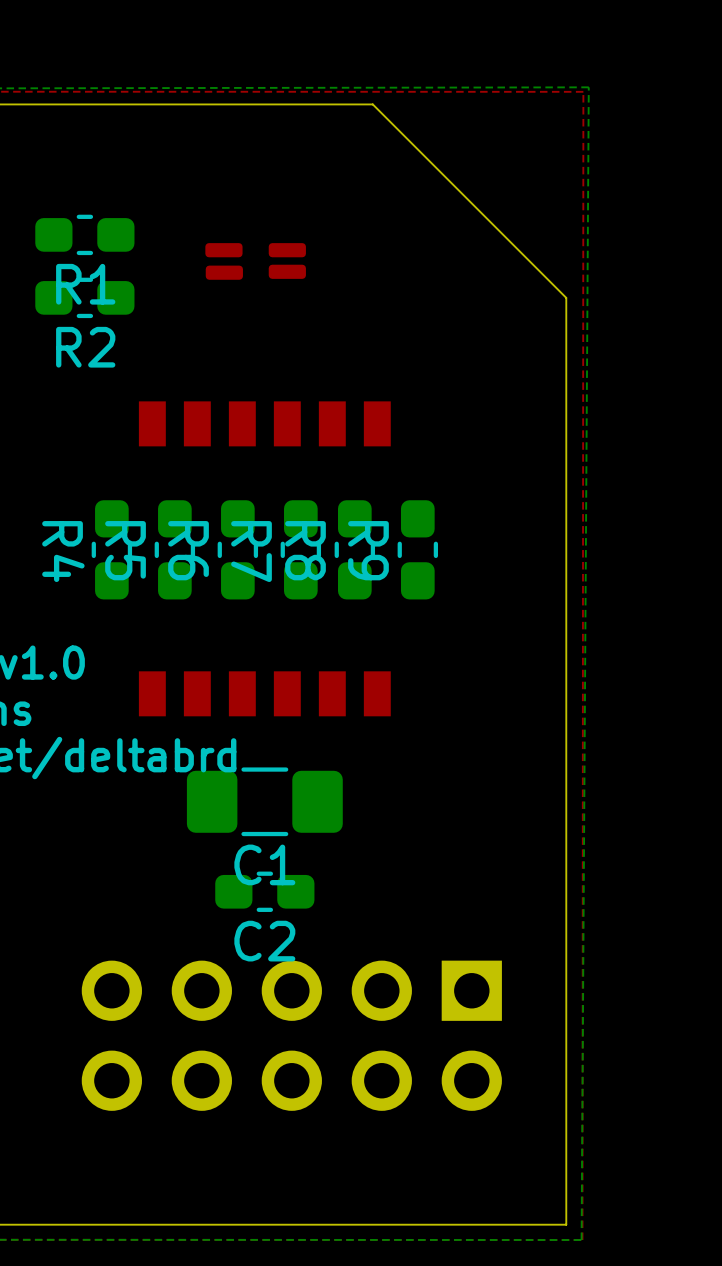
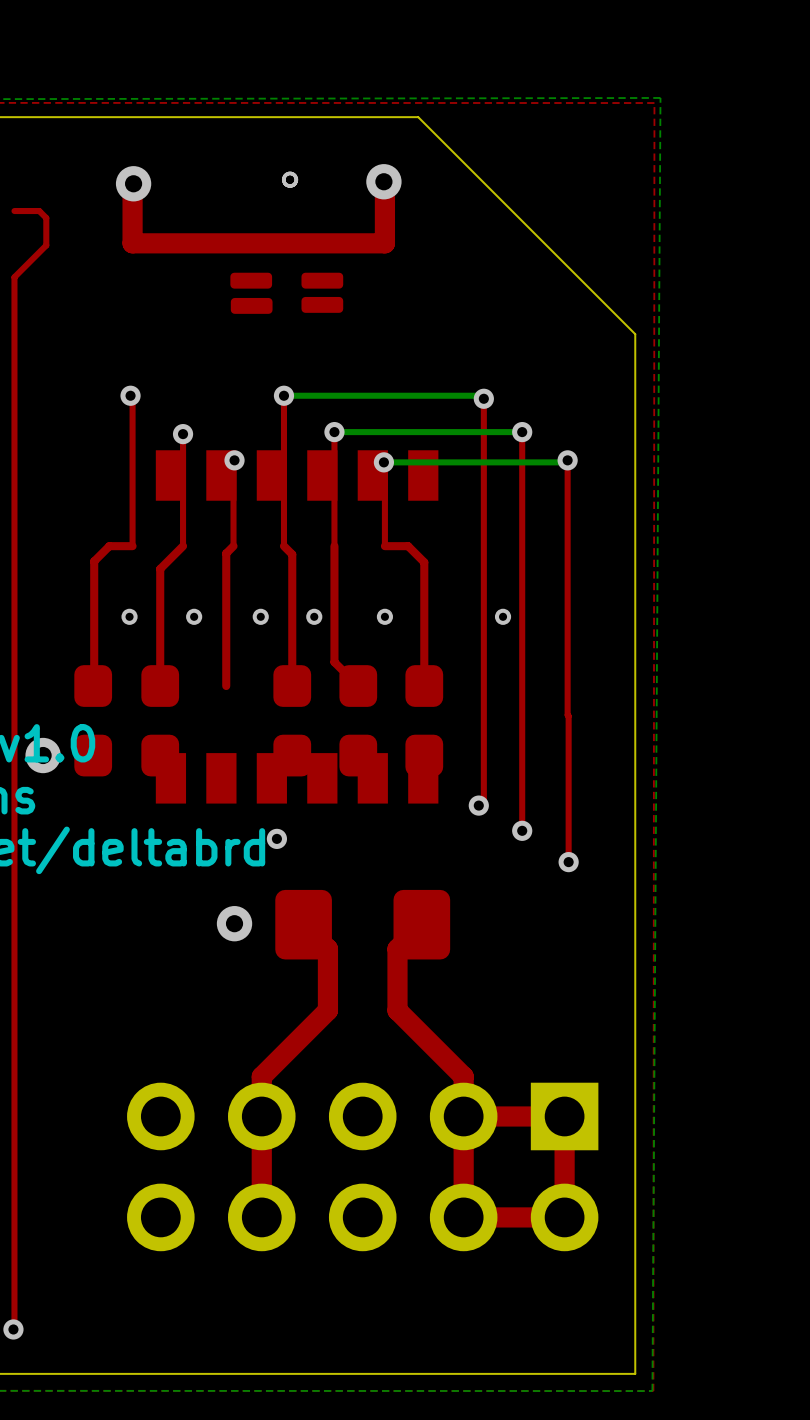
via: none -> (290, 179)
top track: none -> (383, 181) (384, 243) (132, 243) (133, 183)
via: none -> (383, 181)
via: none -> (133, 183)
top track: none -> (14, 211) (39, 211) (46, 218) (46, 245) (14, 277) (13, 1329)
R1: (84, 234) -> none
R2: (84, 297) -> none
top track: none -> (130, 395) (132, 397) (132, 546) (109, 546) (94, 561) (94, 686)
via: none -> (130, 395)
top track: none -> (283, 395) (283, 546) (292, 554) (292, 686)
bottom track: none -> (283, 395) (480, 395) (483, 398)
via: none -> (283, 395)
top track: none -> (483, 398) (483, 800) (478, 805)
via: none -> (483, 398)
top track: none -> (334, 432) (334, 662) (358, 686)
via: none -> (334, 432)
top track: none -> (522, 432) (522, 830)
bottom track: none -> (522, 432) (334, 432)
via: none -> (522, 432)
top track: none -> (183, 434) (183, 546) (160, 568) (160, 686)
via: none -> (183, 434)
top track: none -> (234, 460) (233, 546) (226, 553) (226, 686)
via: none -> (234, 460)
top track: none -> (567, 460) (568, 862)
bottom track: none -> (567, 460) (565, 462) (383, 462)
via: none -> (567, 460)
top track: none -> (383, 462) (384, 546) (408, 546) (424, 562) (424, 686)
via: none -> (383, 462)
R4: (111, 549) -> none
via: none -> (129, 616)
via: none -> (194, 616)
R5: (174, 549) -> none
via: none -> (260, 616)
R6: (237, 549) -> none
via: none -> (314, 616)
R7: (300, 549) -> none
via: none -> (384, 616)
R8: (354, 549) -> none
R9: (417, 549) -> none
via: none -> (503, 616)
part: none -> (93, 720)
part: none -> (160, 720)
part: none -> (292, 720)
part: none -> (358, 720)
part: none -> (424, 720)
via: none -> (43, 755)
via: none -> (478, 805)
via: none -> (522, 830)
via: none -> (276, 838)
via: none -> (568, 862)
C1: (264, 801) -> none
via: none -> (234, 923)
top track: none -> (303, 924) (327, 949) (327, 1010) (261, 1076) (261, 1217)
part: none -> (362, 924)
top track: none -> (421, 924) (397, 949) (397, 1010) (463, 1076) (463, 1217) (564, 1217) (564, 1116) (463, 1116)
C2: (264, 891) -> none
part position: (291, 1035) -> (362, 1166)
via: none -> (13, 1329)

